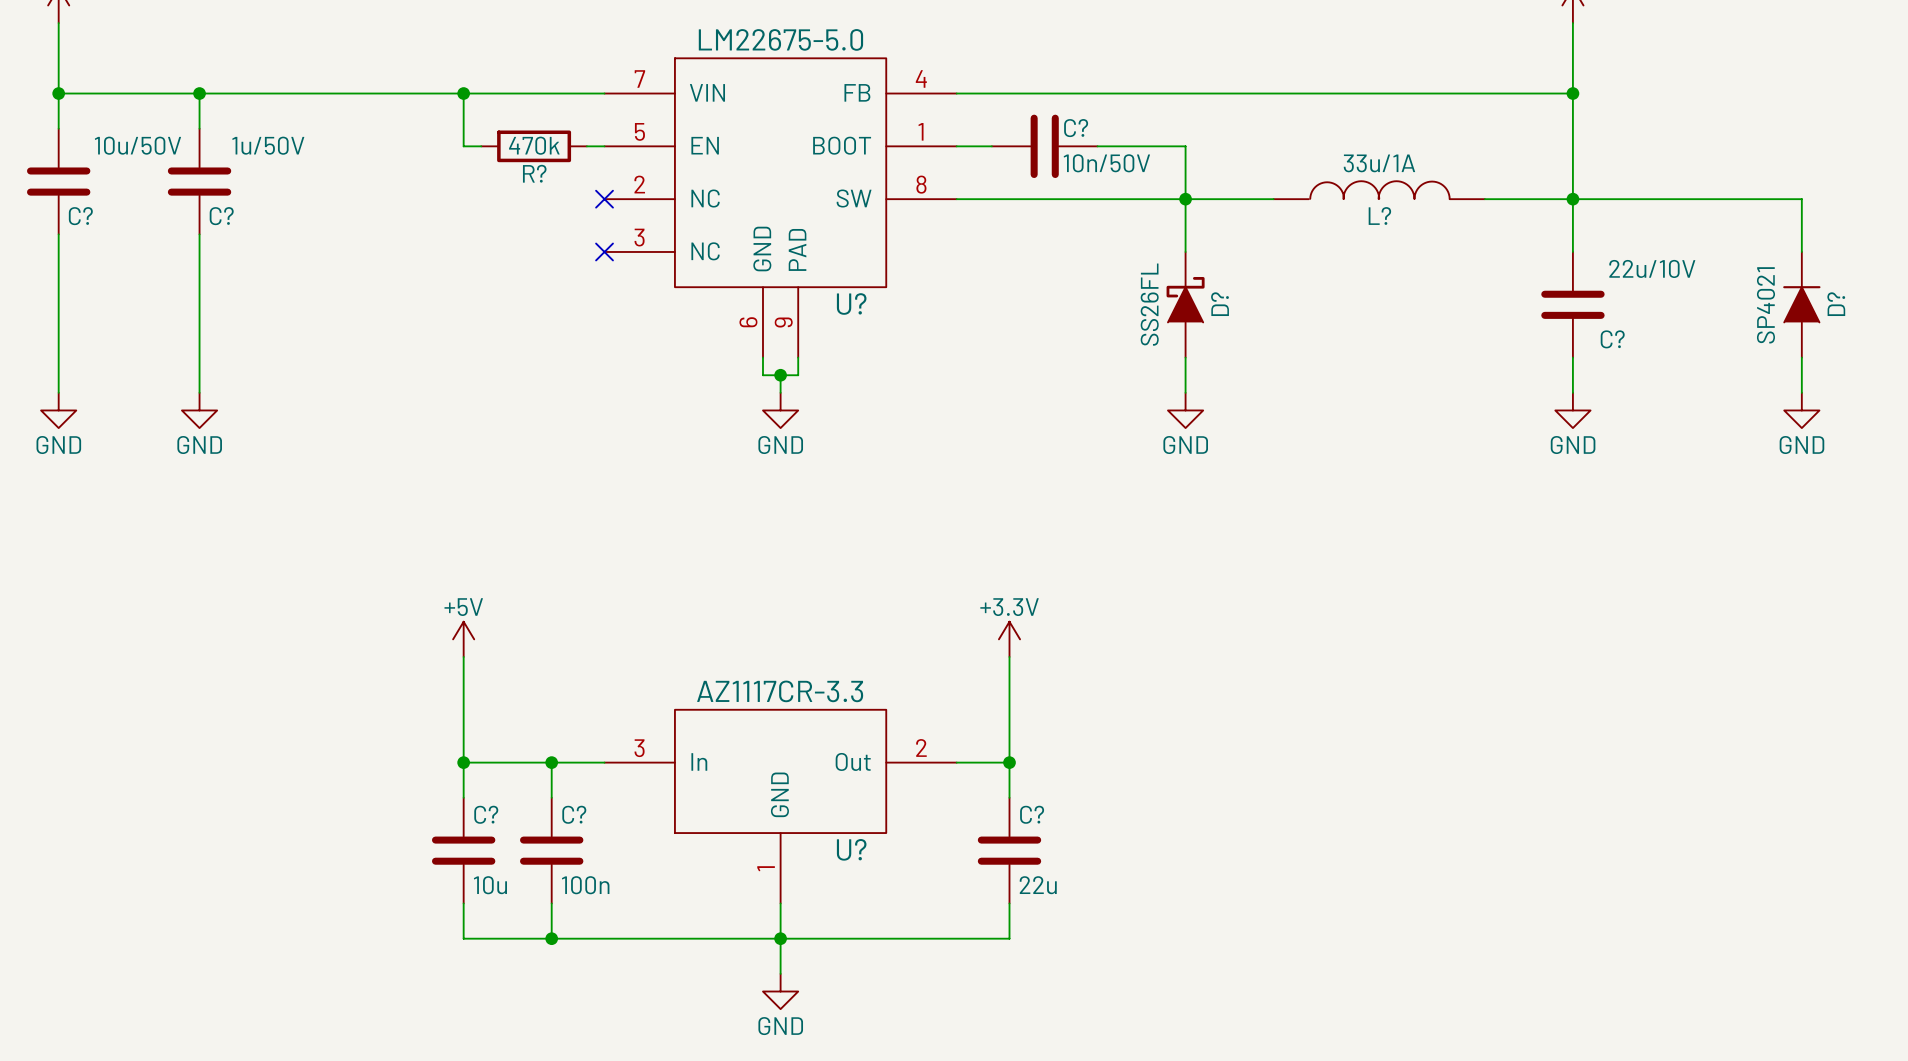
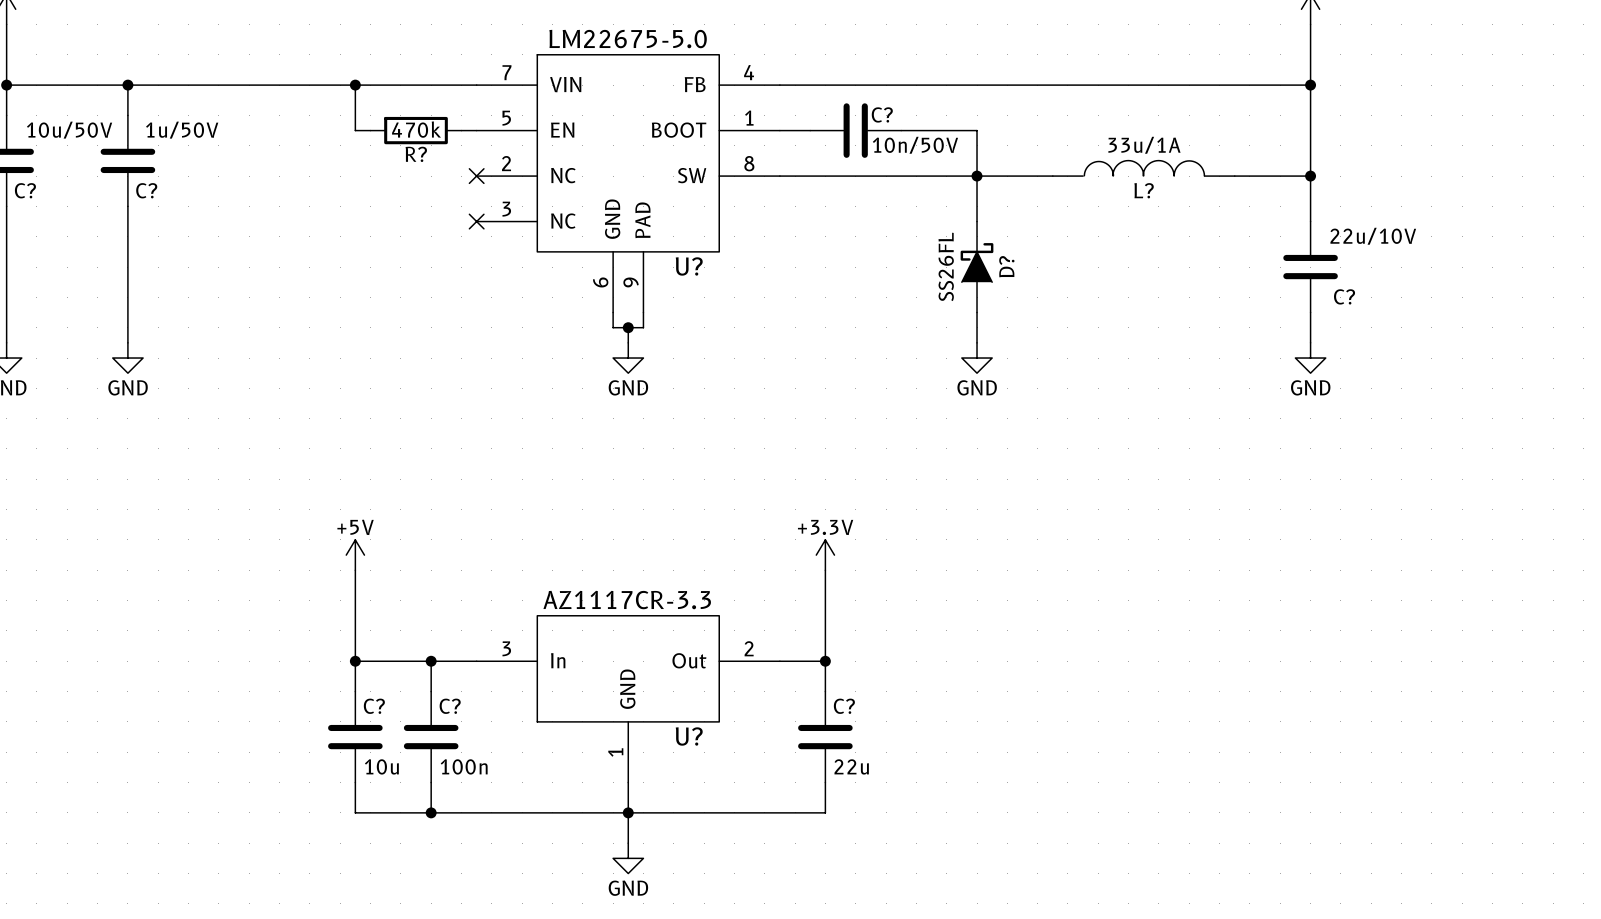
wire: (1572, 199) (1801, 199) (1801, 251) -> none
D?: SP4021 (1801, 304) -> none
wire: (1801, 357) (1801, 392) -> none
power symbol: GND (1801, 410) -> none

